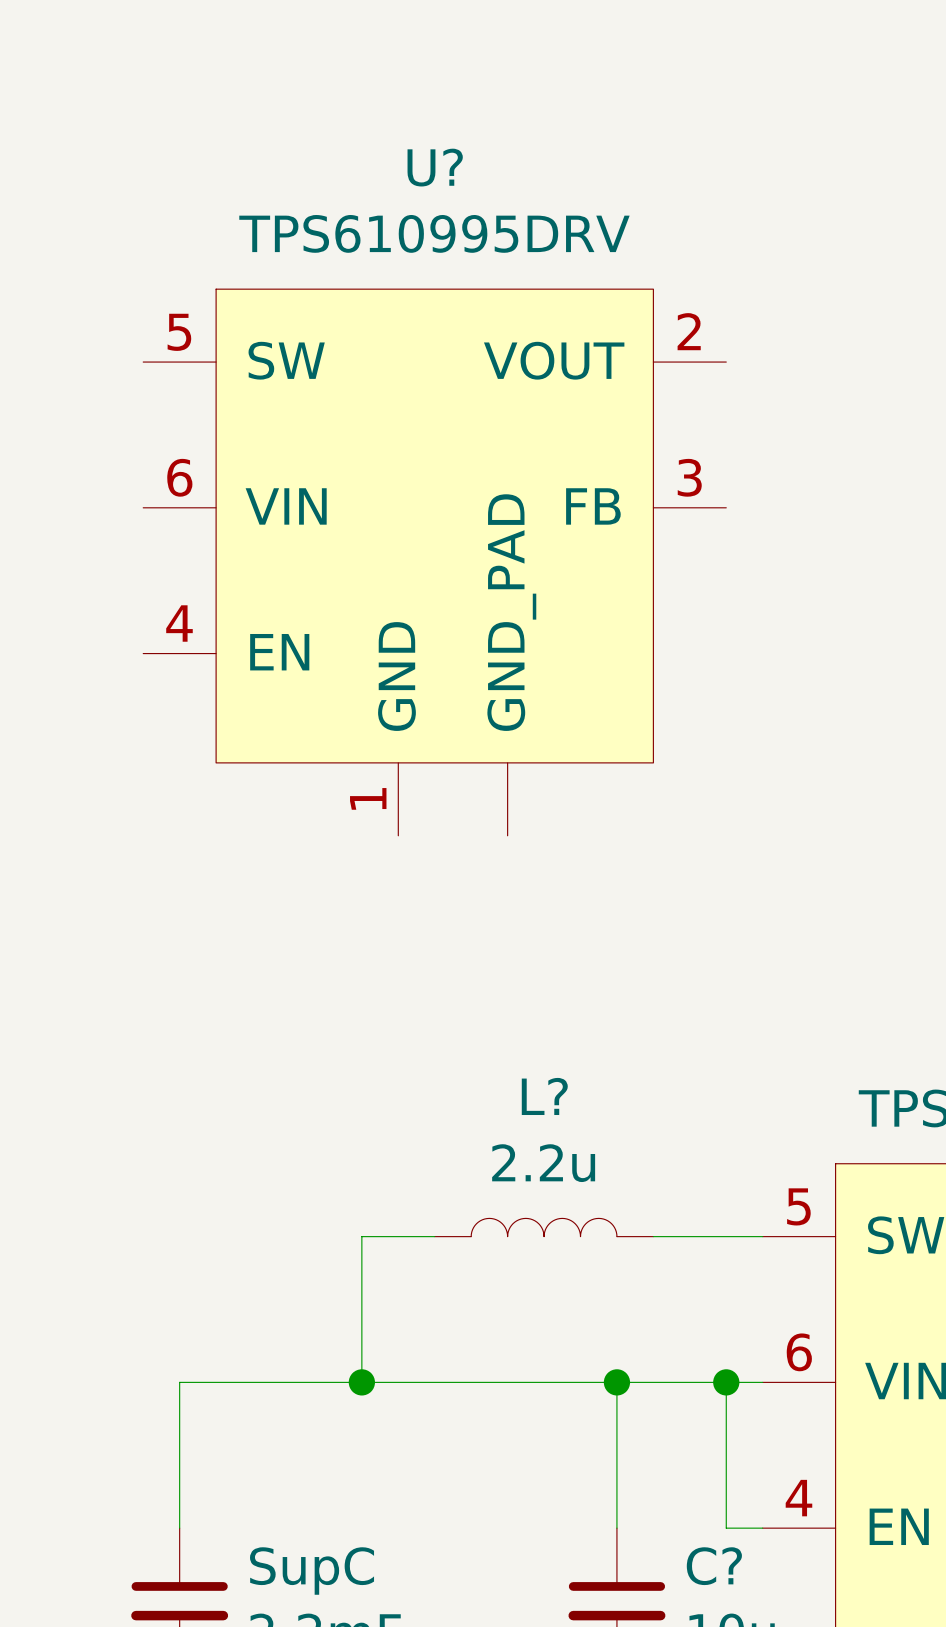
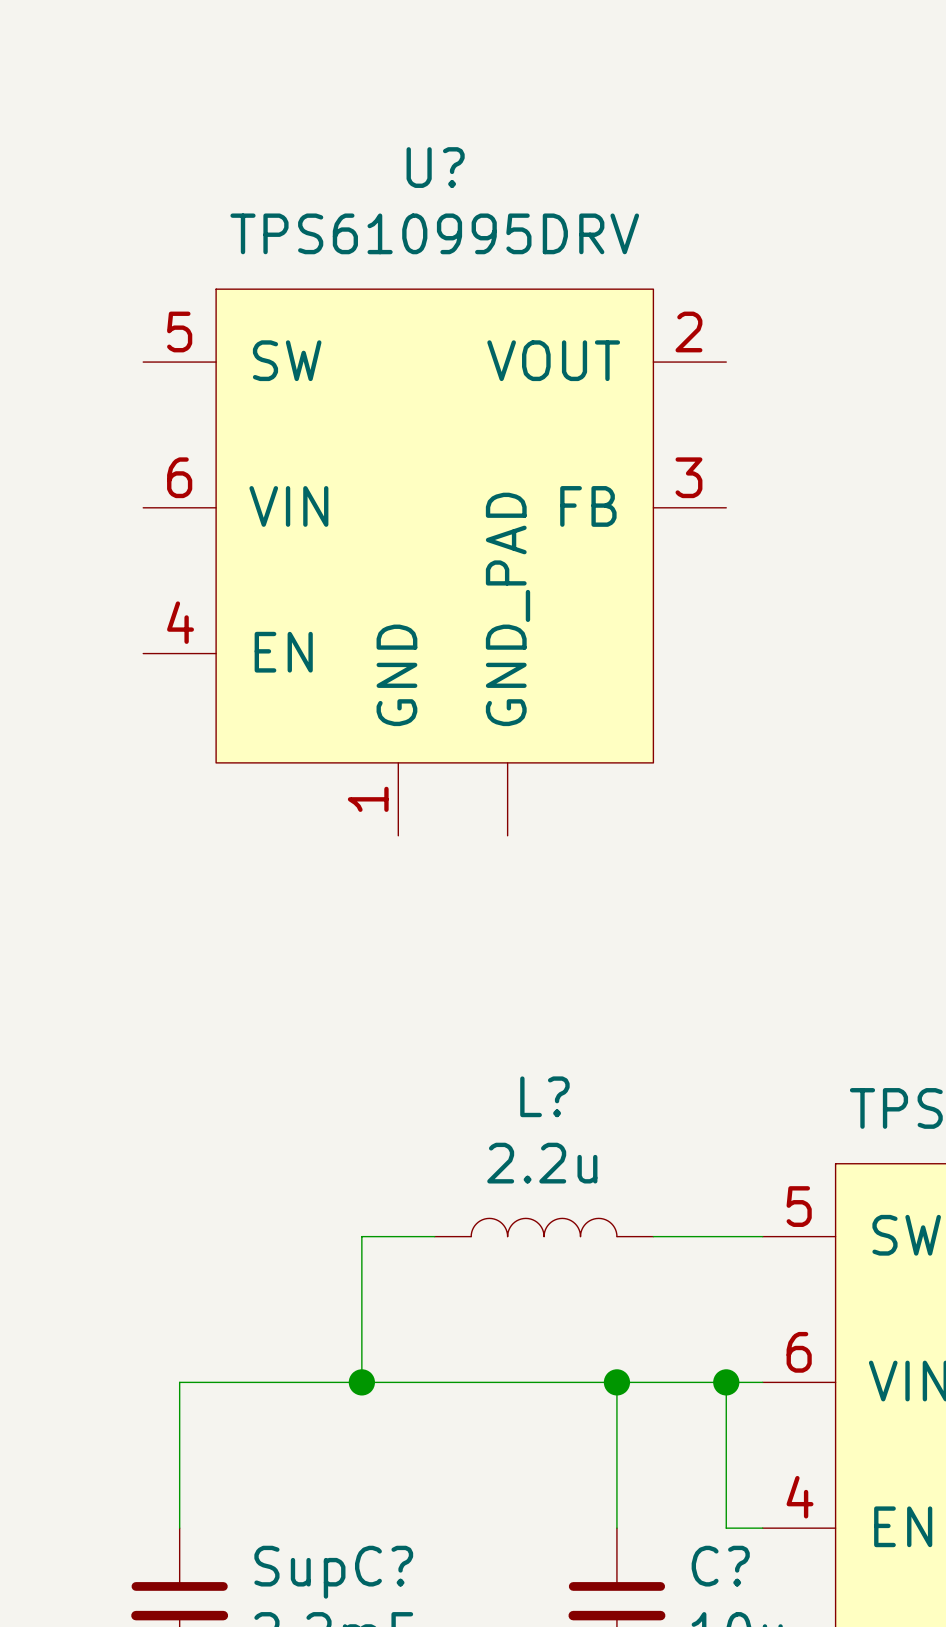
SupC name: SupC (312, 1571) -> SupC? (333, 1572)

